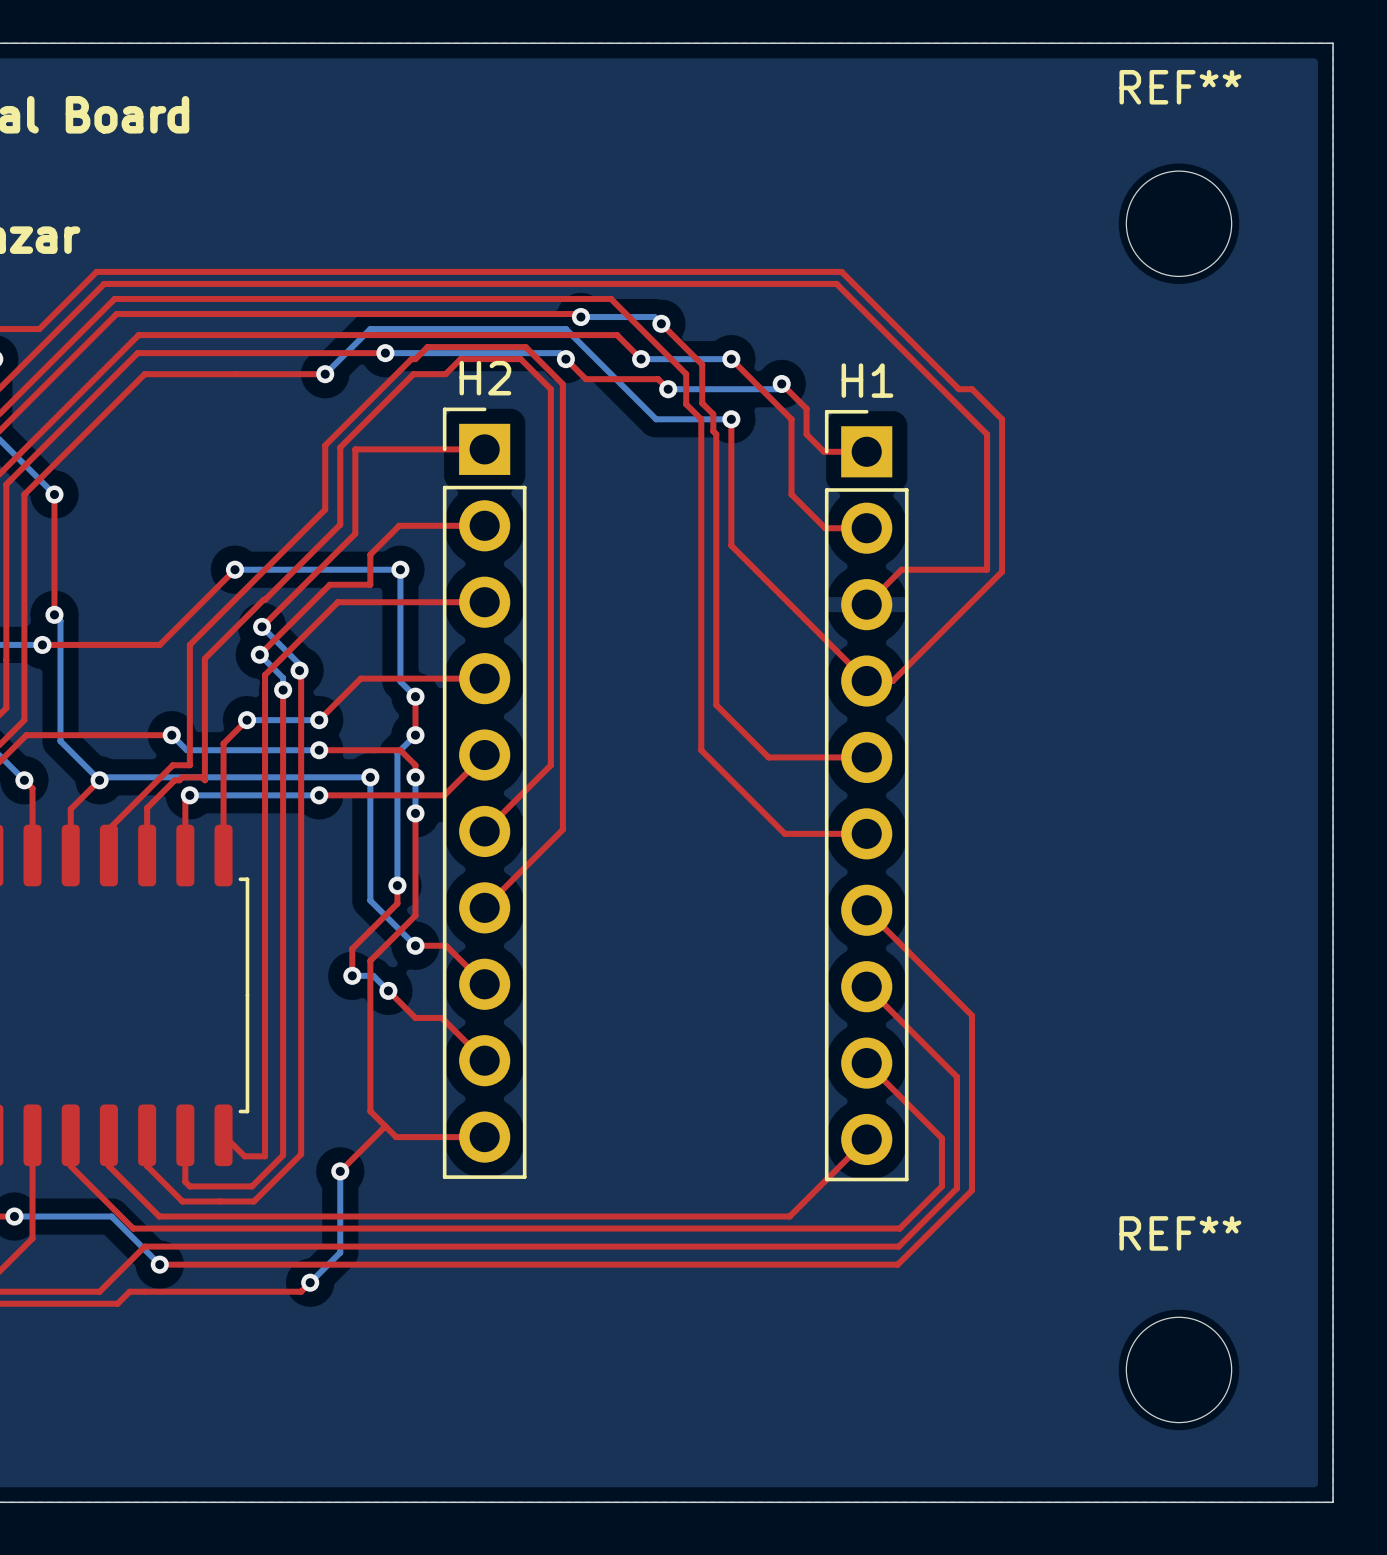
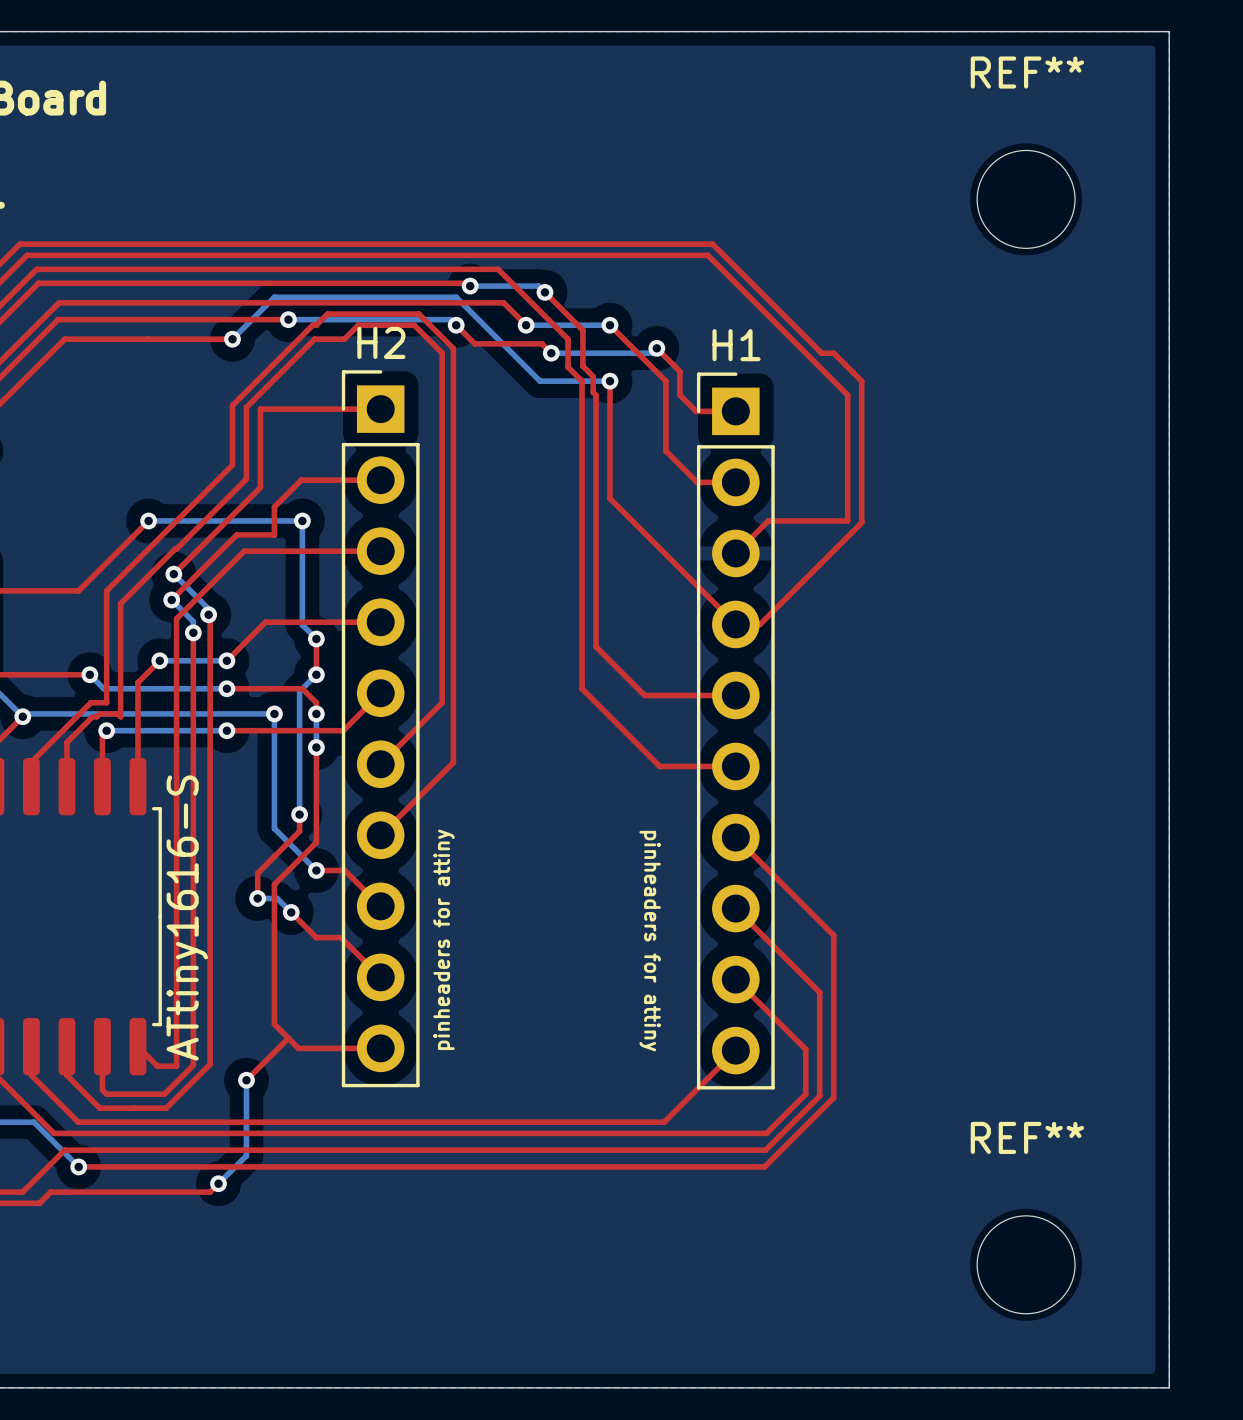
part value: none -> ATtiny1616-S (187, 917)
H2 value: none -> pinheaders for attiny (444, 939)
text: none -> pinheaders for attiny (650, 941)

